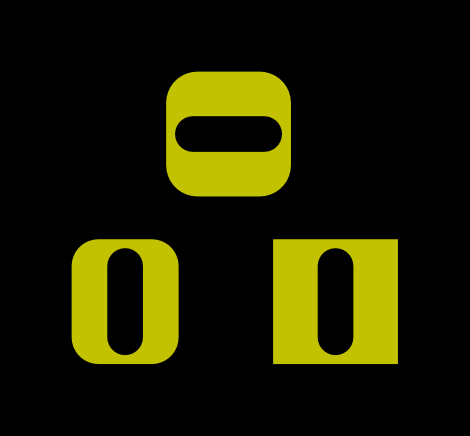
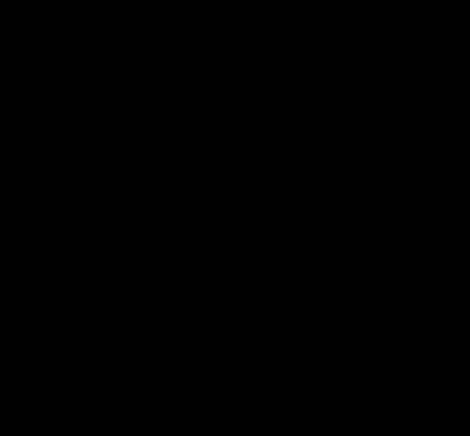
part: (234, 217) -> none

